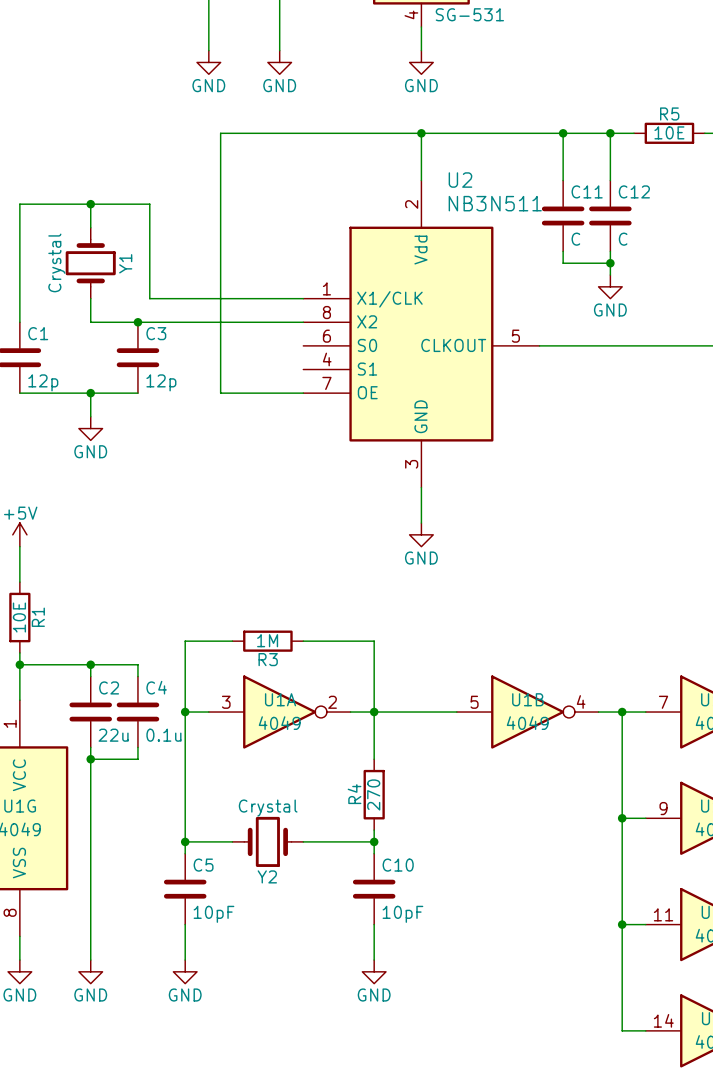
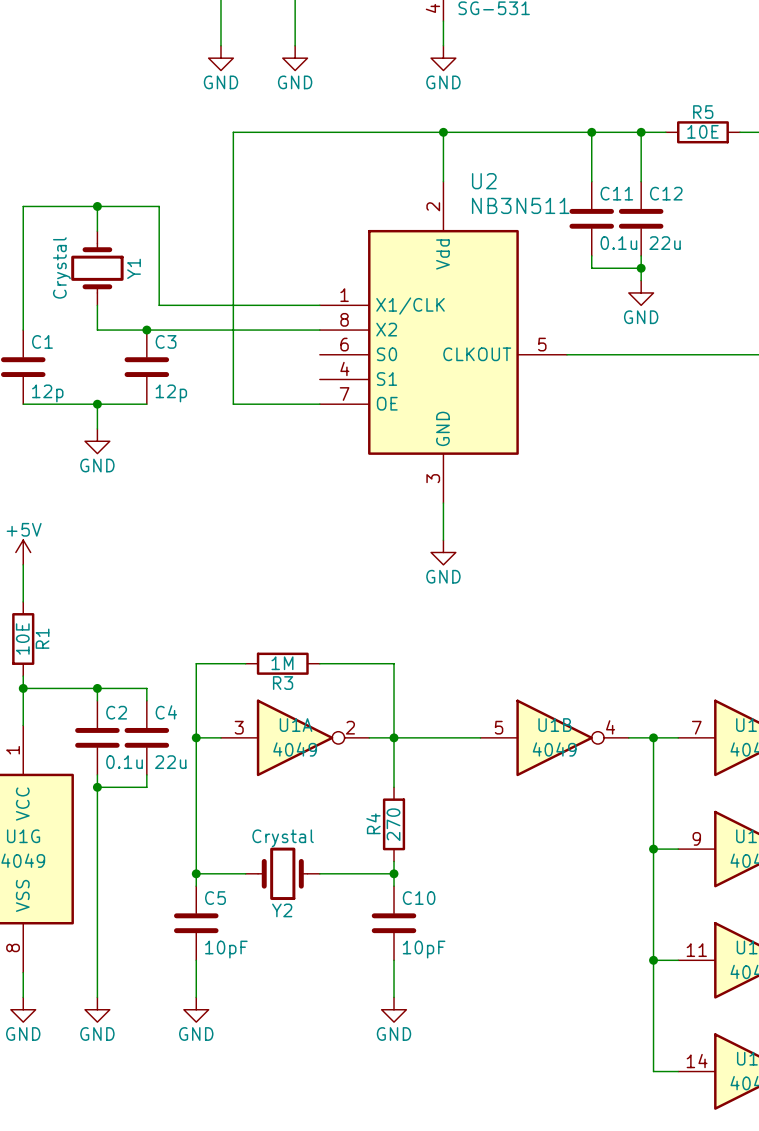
C11 value: C (575, 239) -> 0.1u (618, 243)
C12 value: C (623, 239) -> 22u (665, 243)
C2 value: 22u (113, 735) -> 0.1u (124, 762)
C4 value: 0.1u (163, 735) -> 22u (170, 762)

